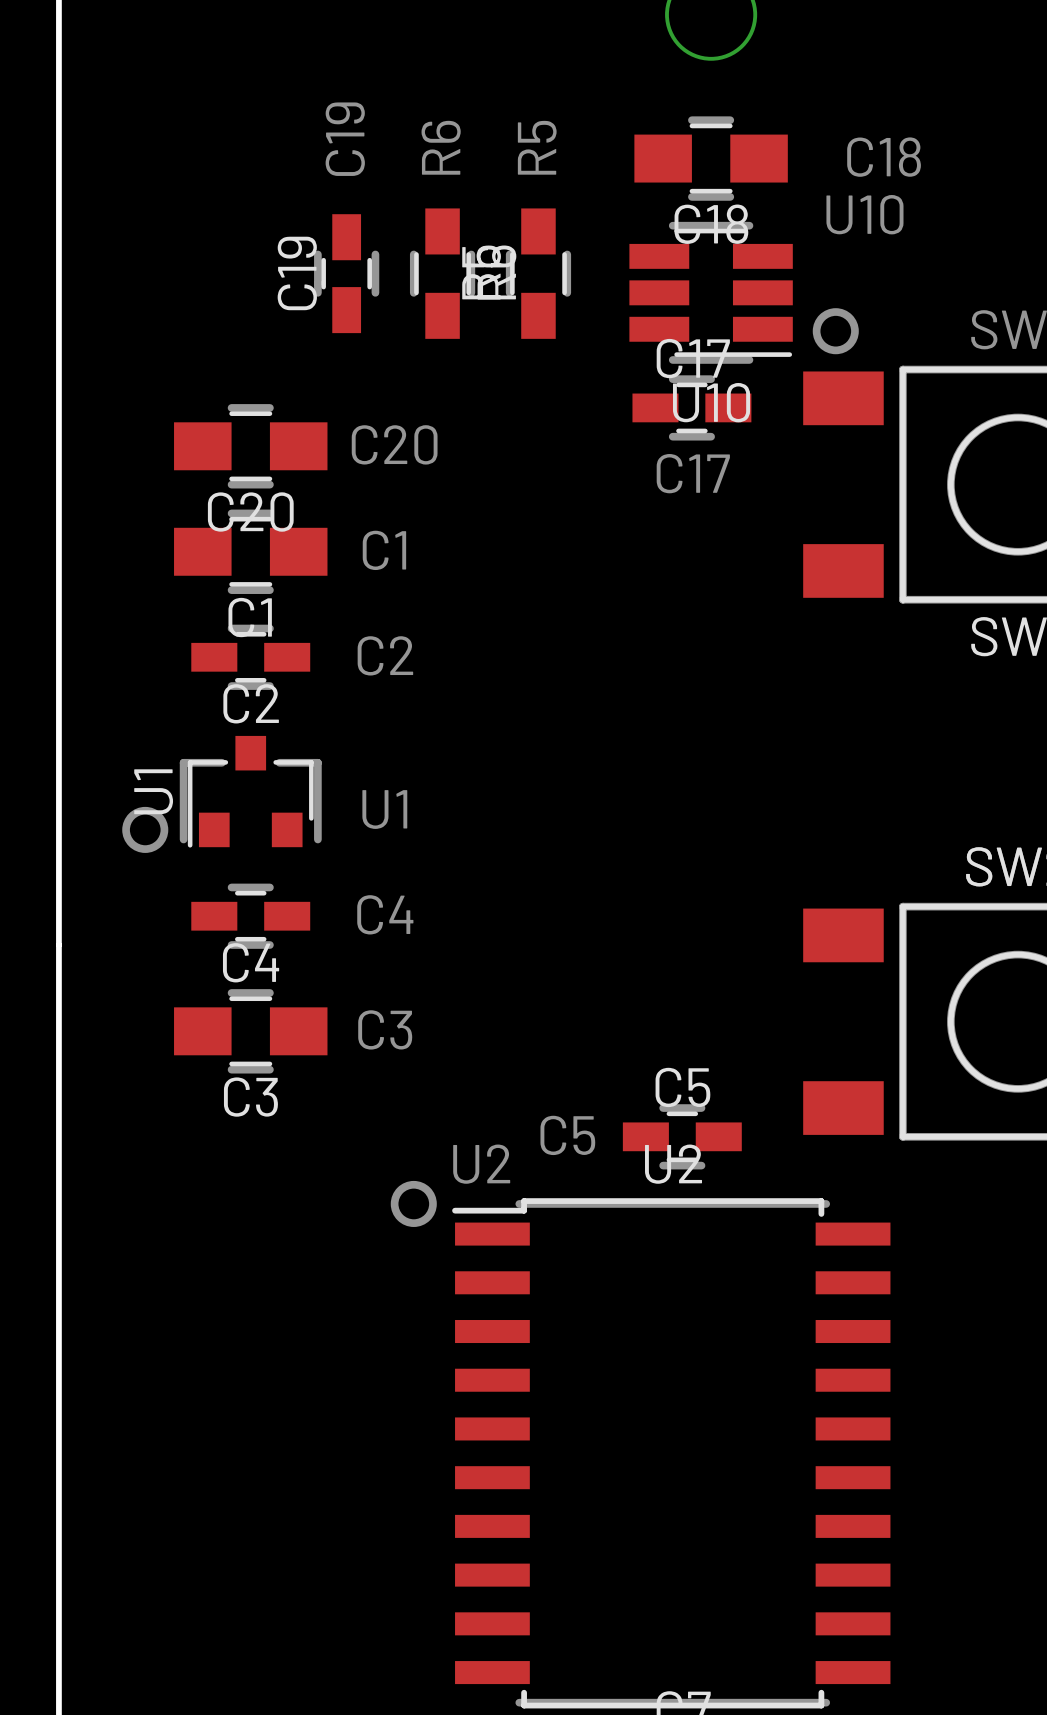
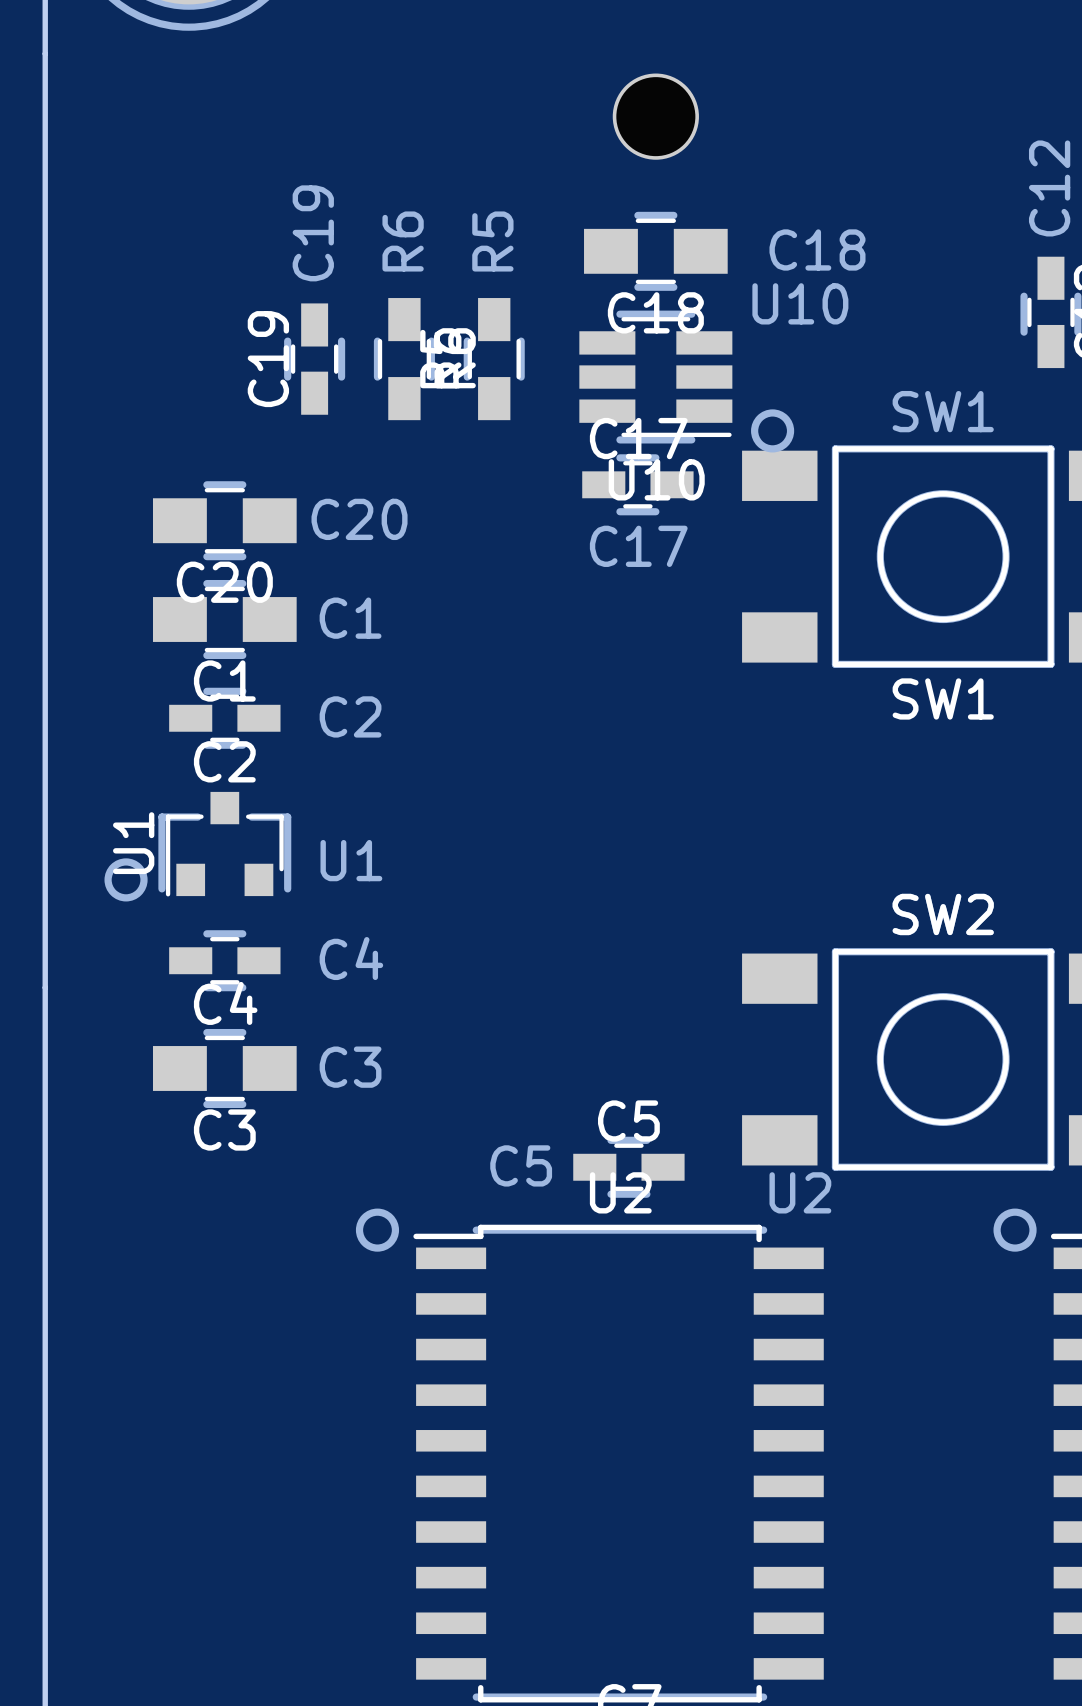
drawing position: (835, 331) -> (772, 430)
text position: U2 (481, 1164) -> U2 (800, 1192)

